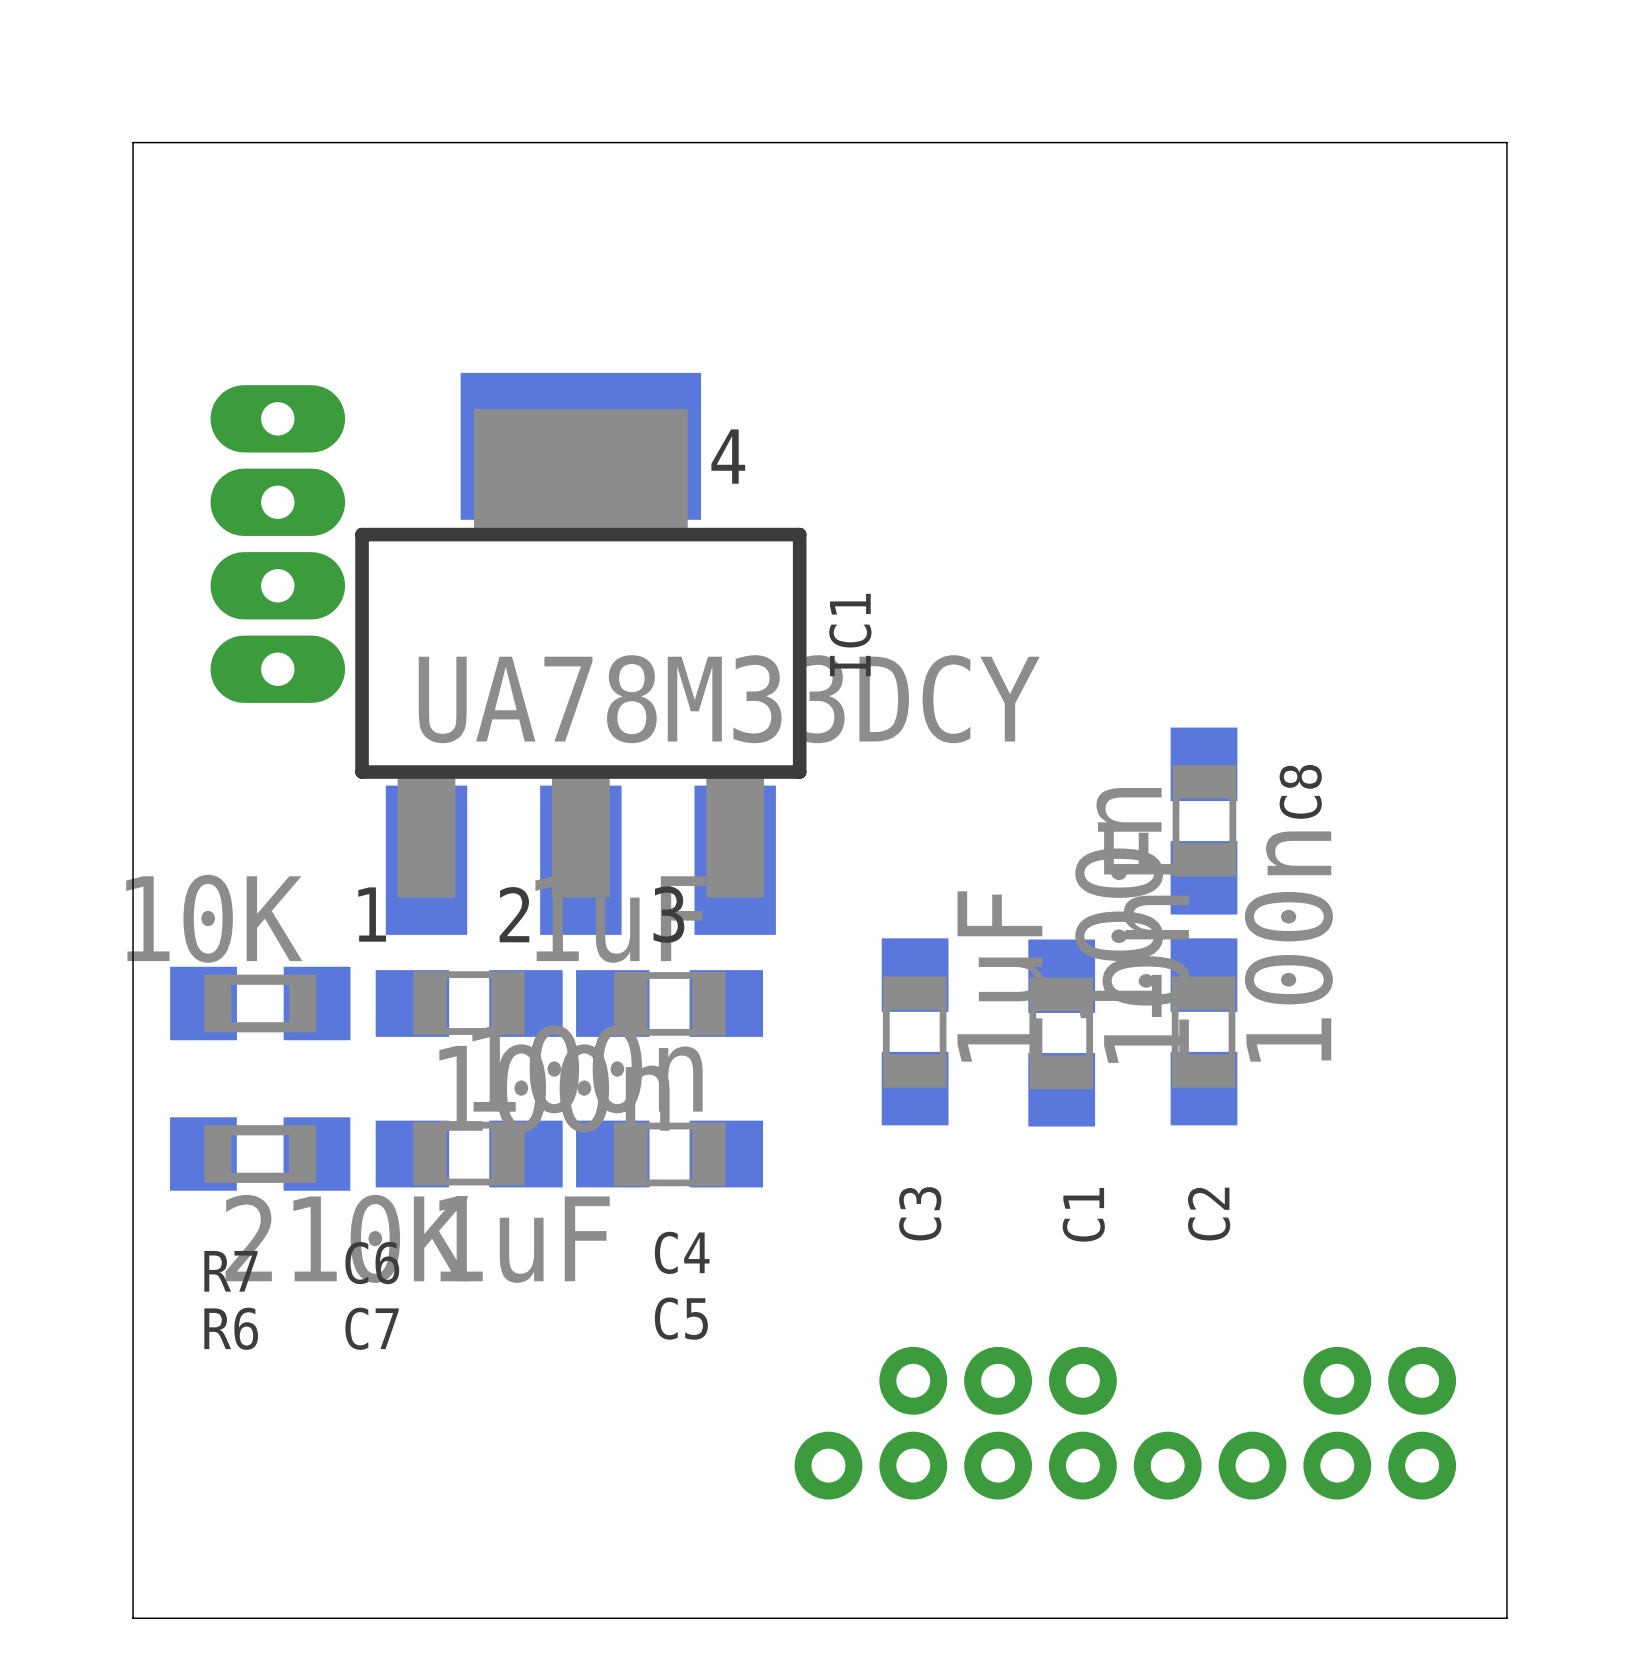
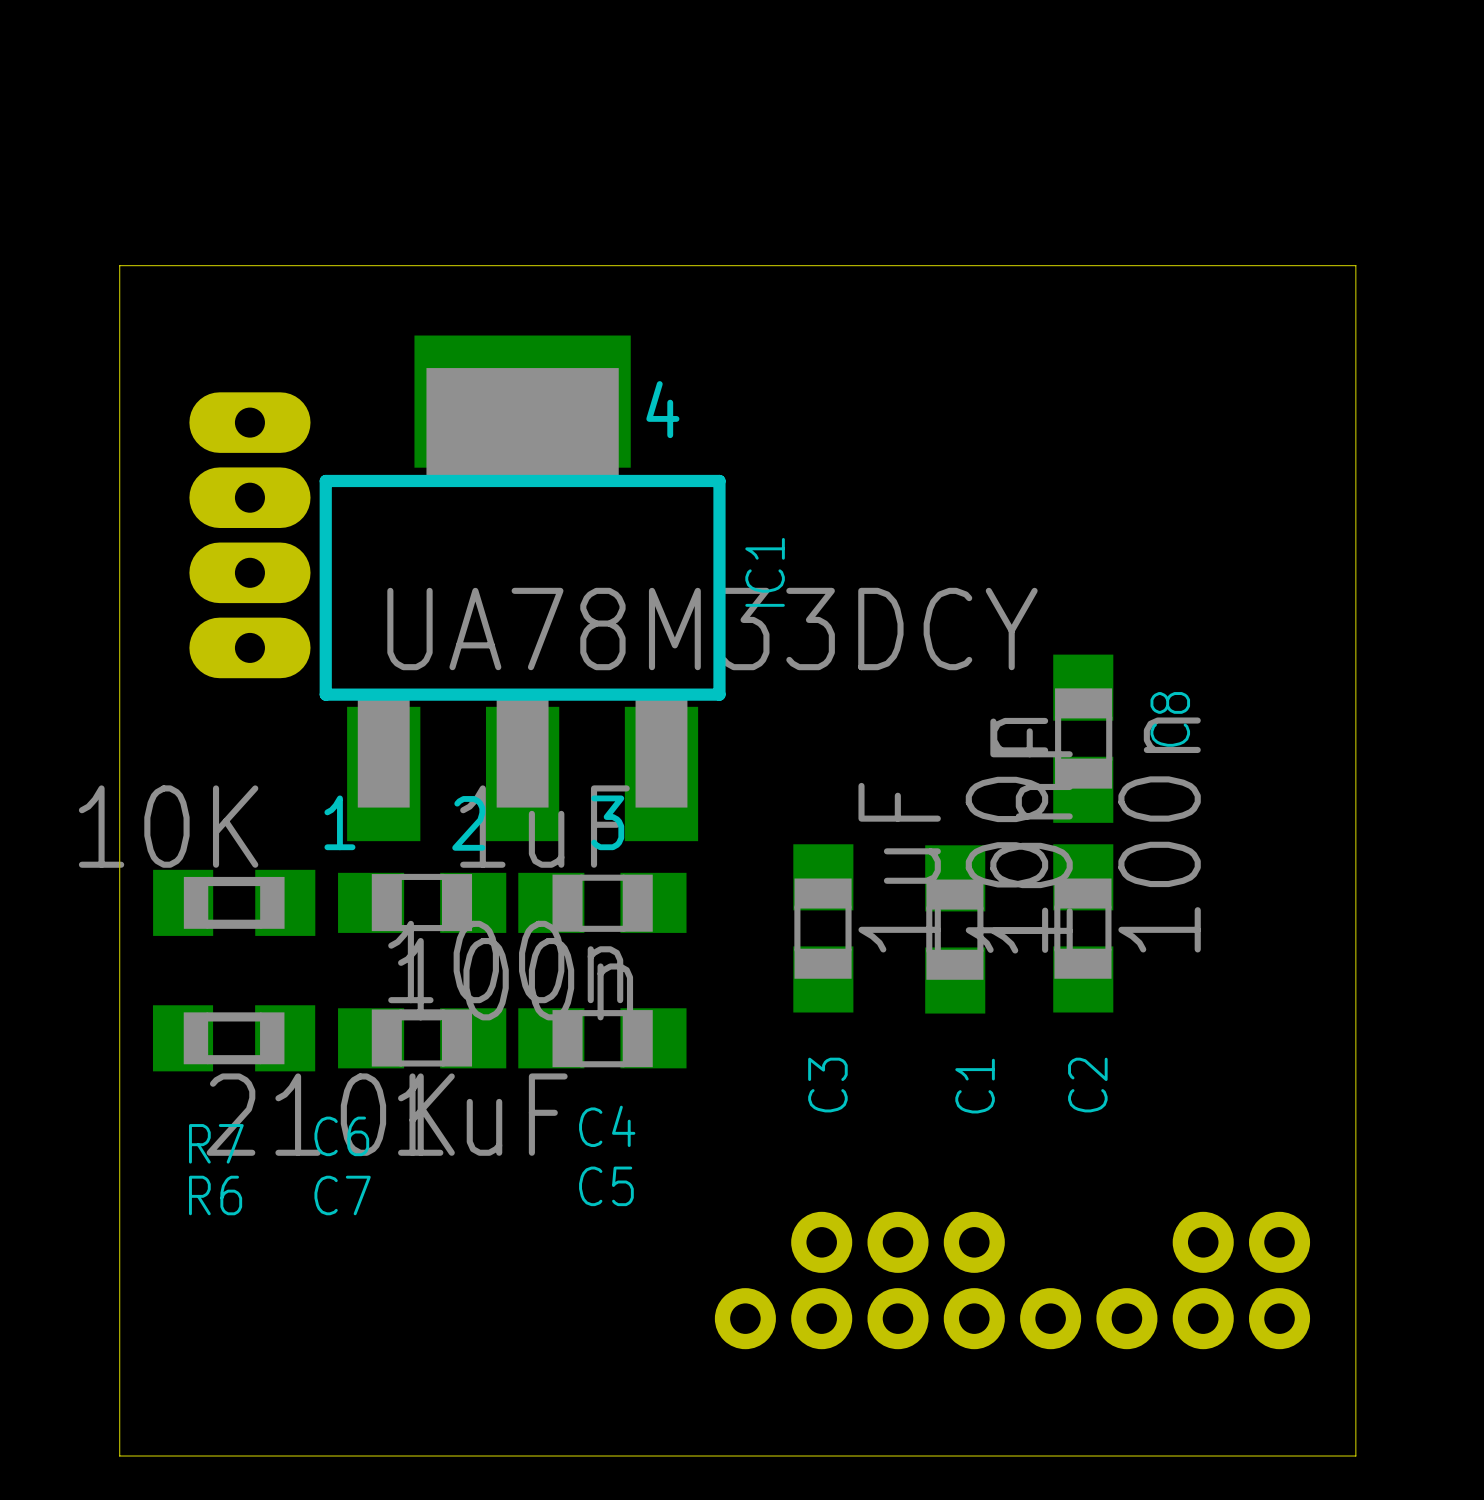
board edge: (1506, 295) (1506, 142) (133, 142) (133, 295) -> (1355, 265) (119, 265)
part position: (277, 544) -> (249, 535)

